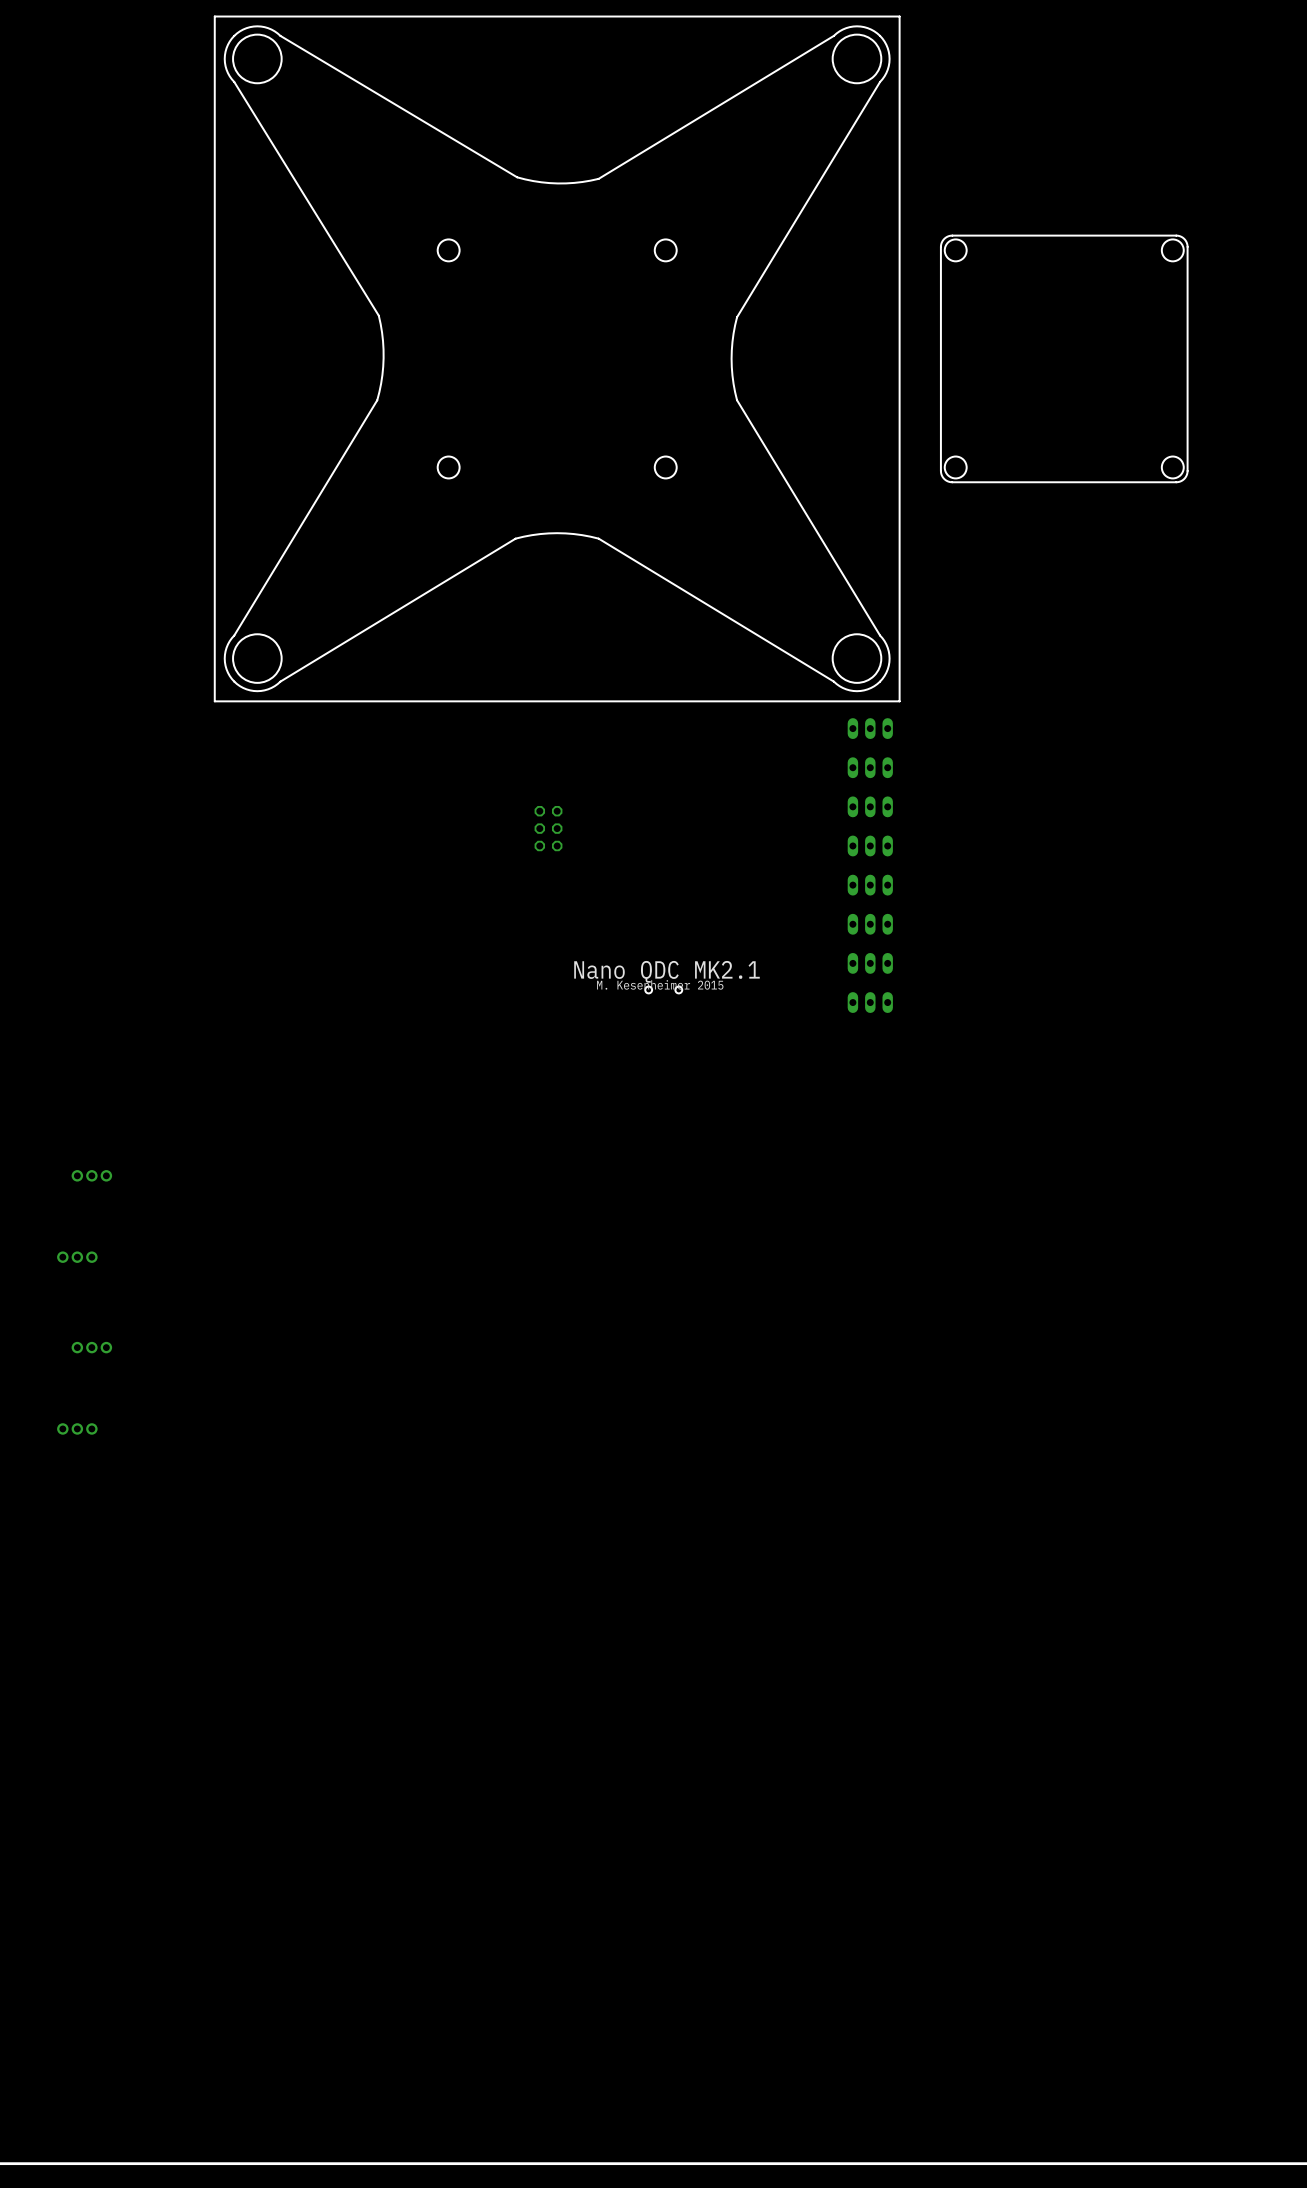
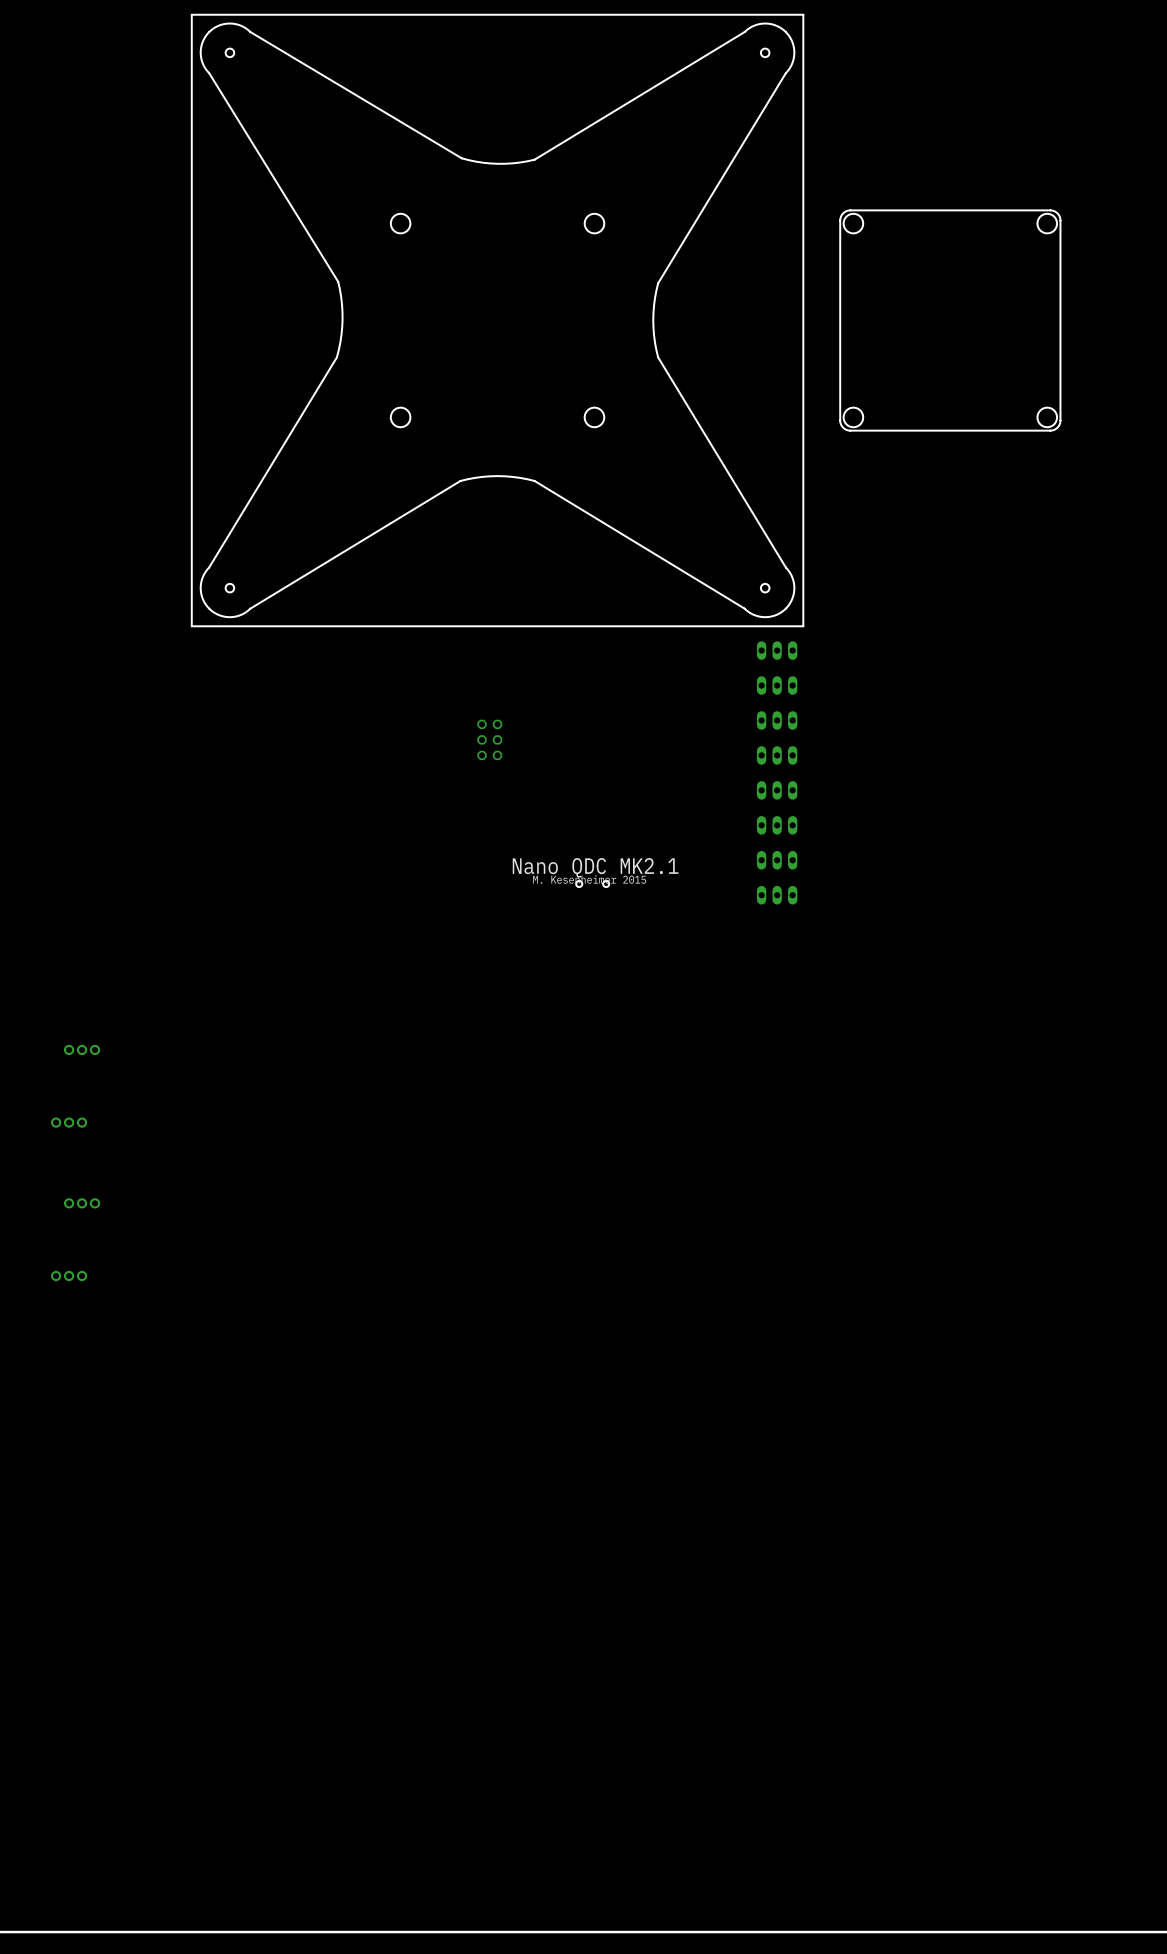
round board edge: [232, 34, 282, 84] -> none
round board edge: [832, 34, 882, 84] -> none
hole: none -> (229, 52)
hole: none -> (765, 52)
round board edge: [232, 634, 282, 684] -> none
round board edge: [832, 634, 882, 684] -> none
hole: none -> (229, 588)
hole: none -> (765, 588)

